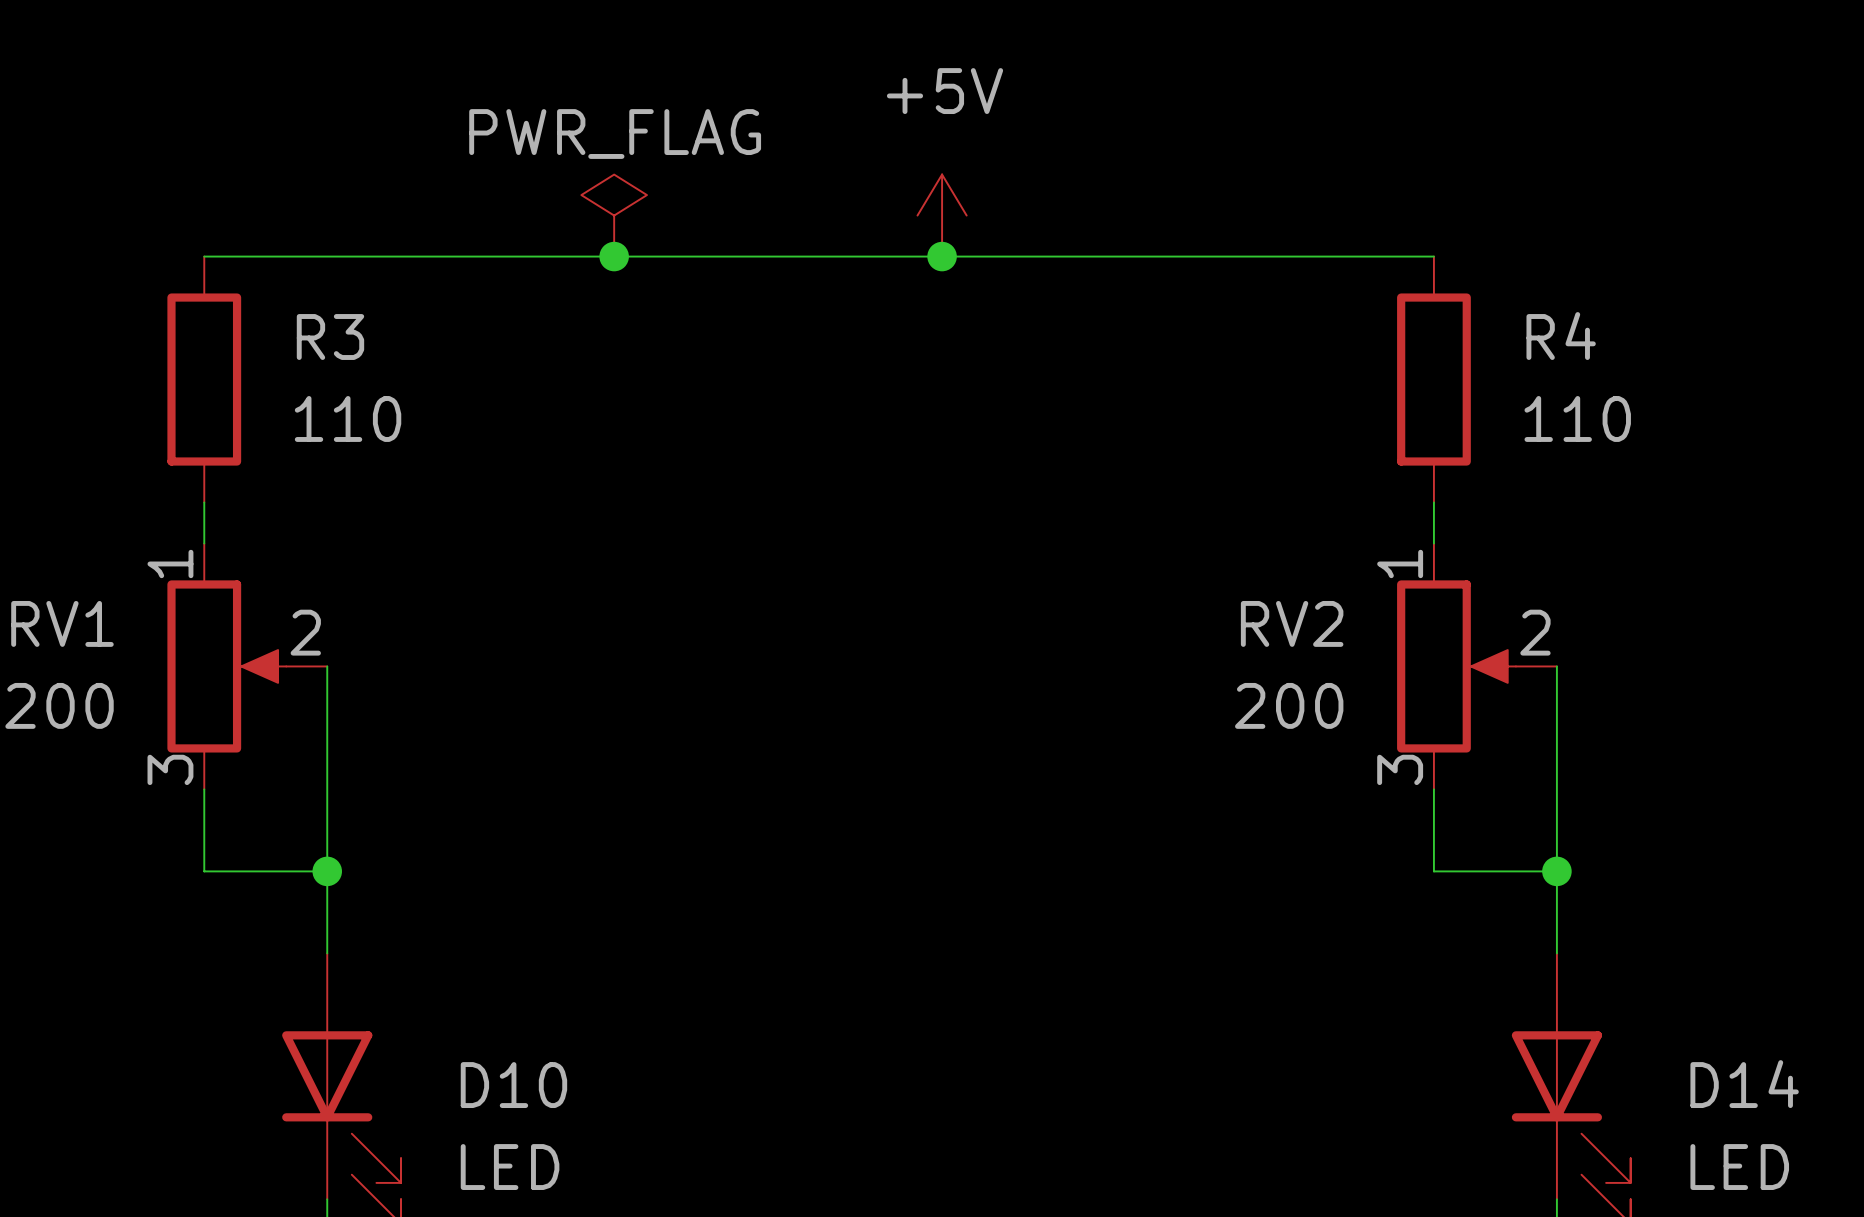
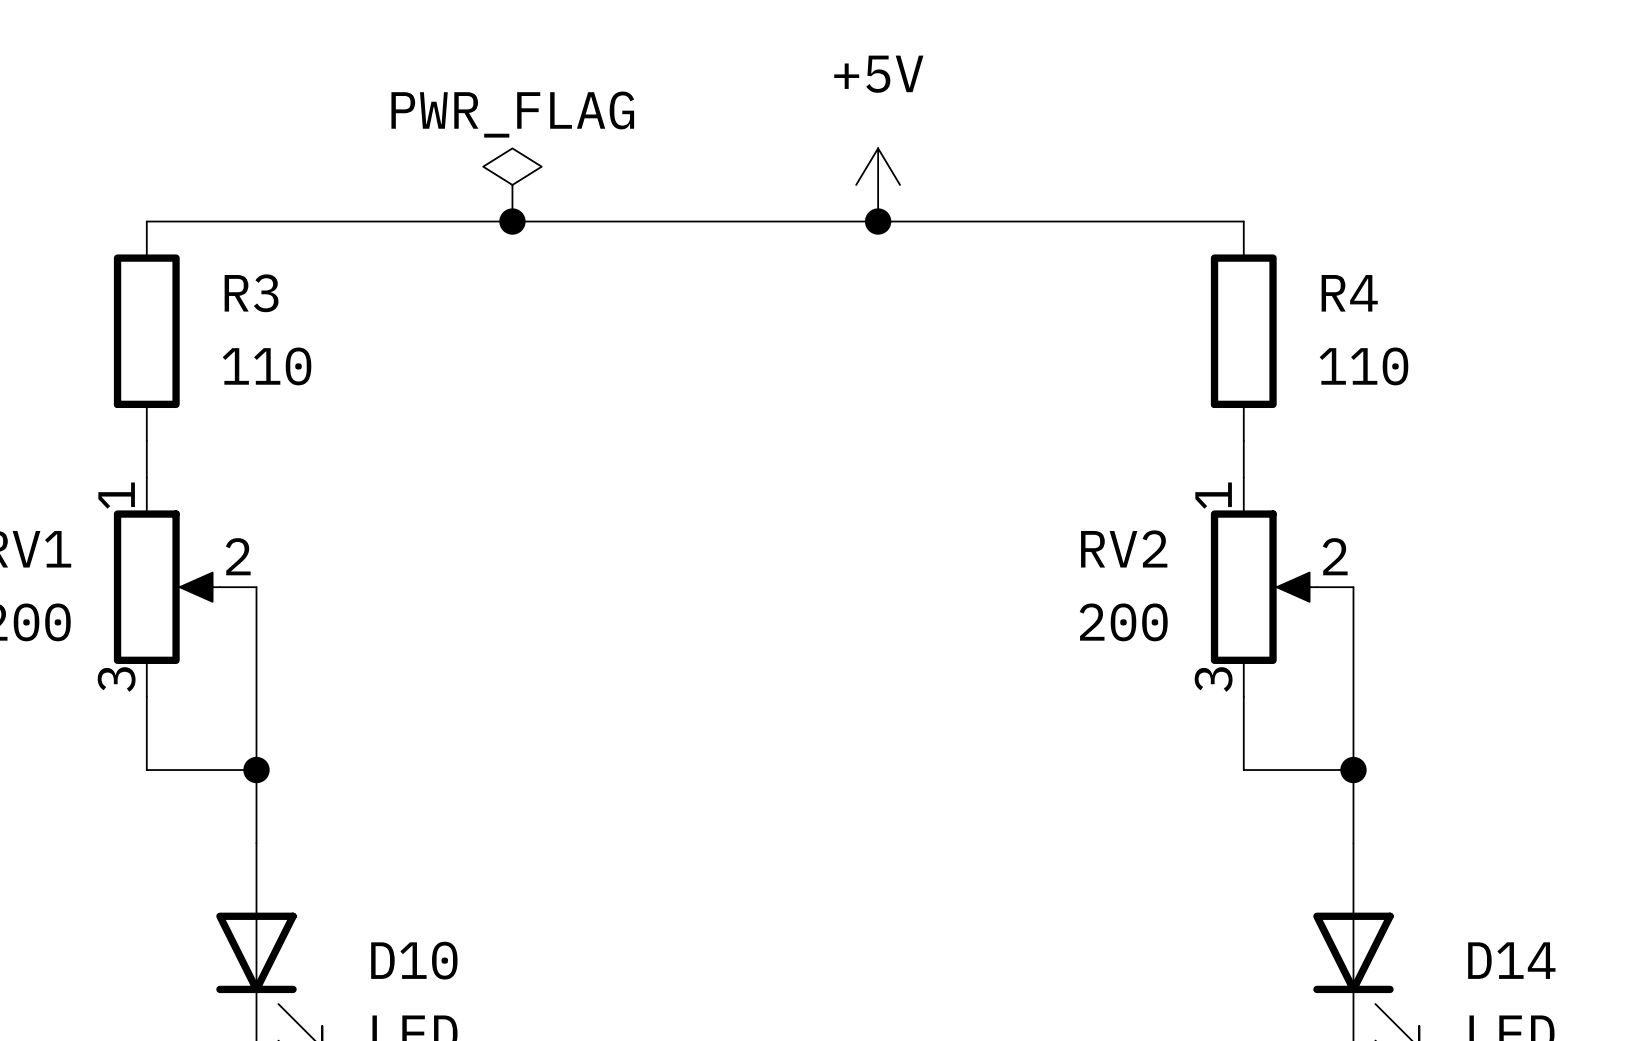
power symbol position: +5V (942, 215) -> +5V (878, 184)
junction position: (942, 256) -> (878, 221)

